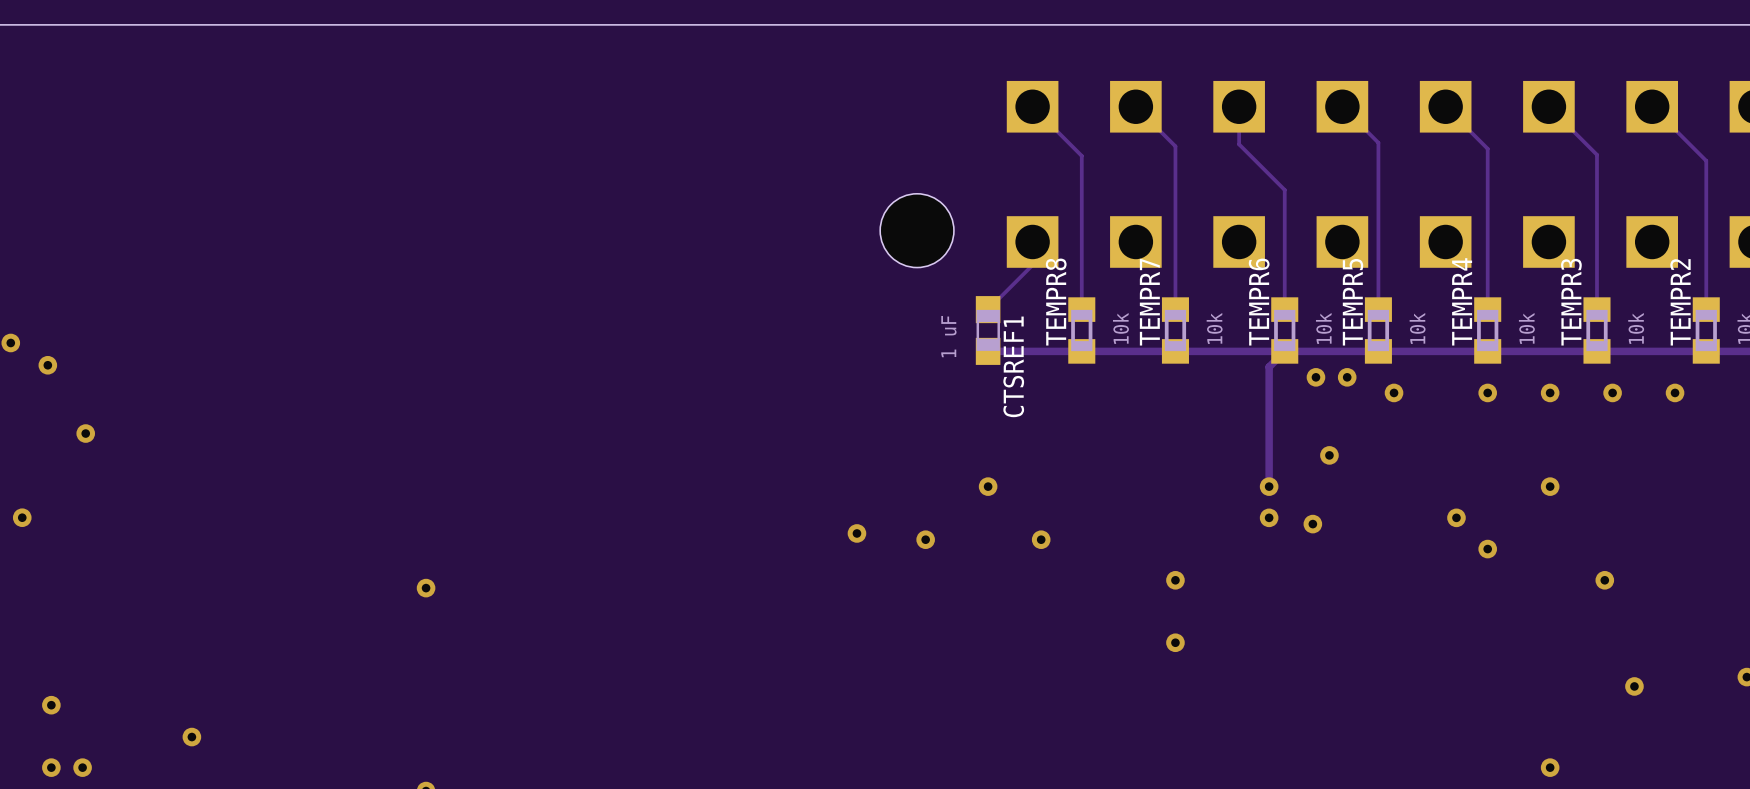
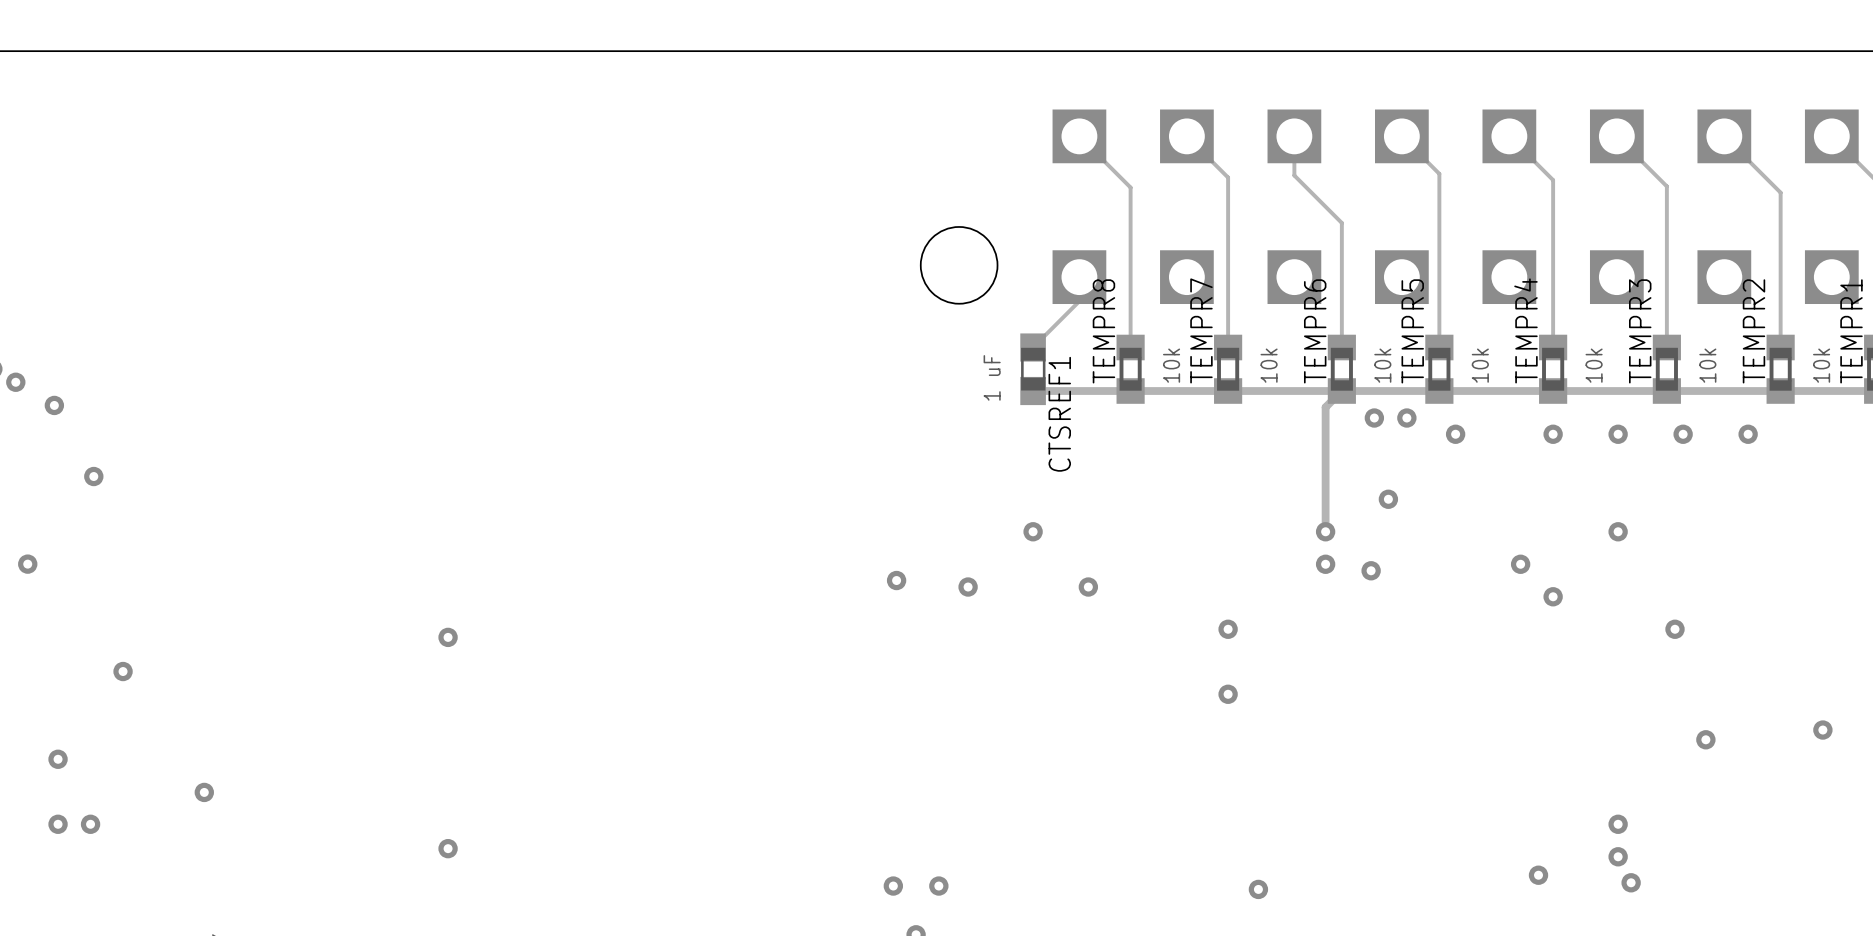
via: none -> (123, 671)

